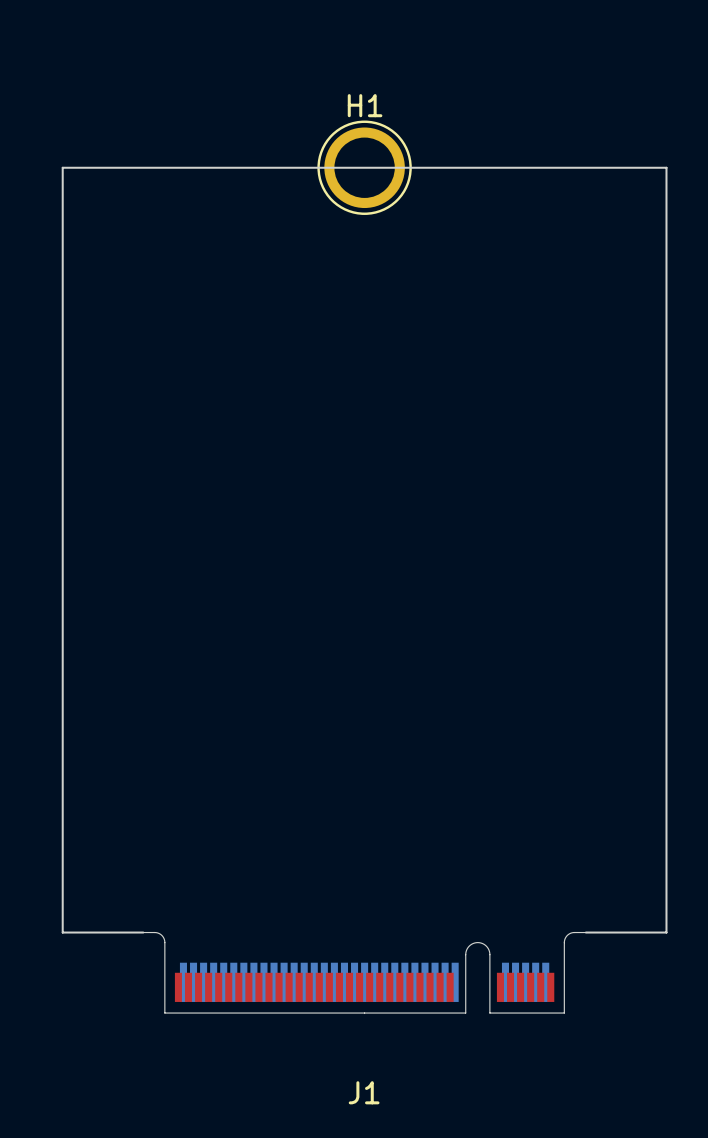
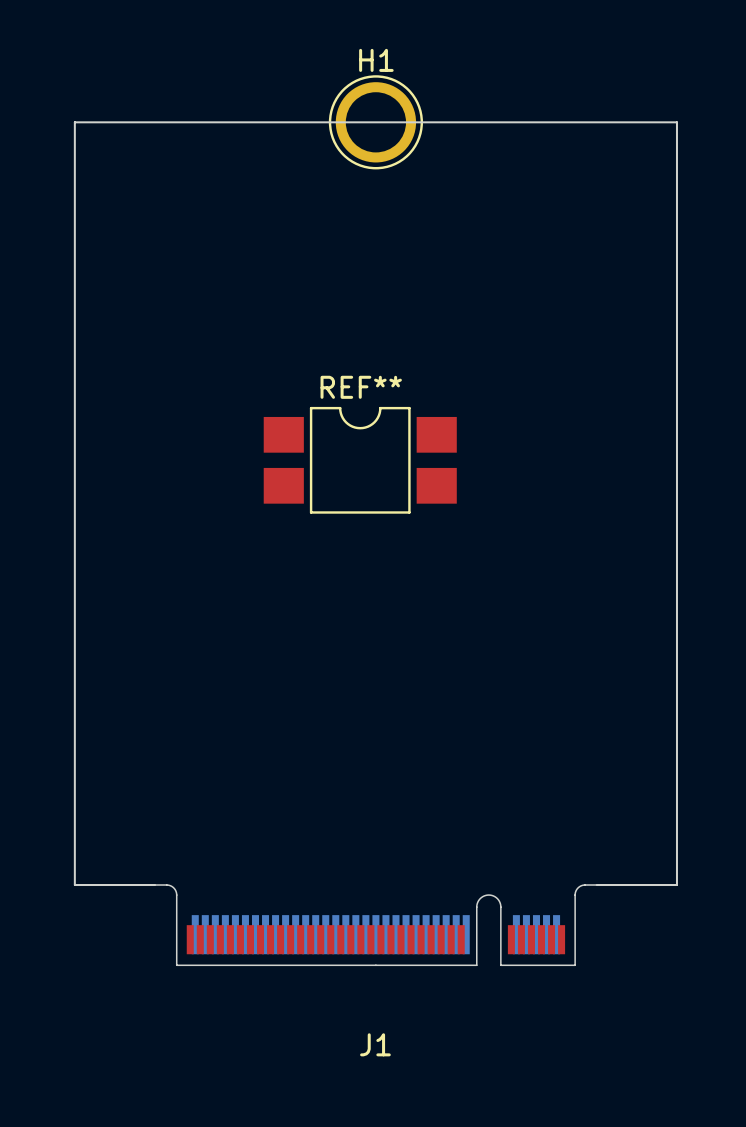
REF**: none -> (360, 460)

